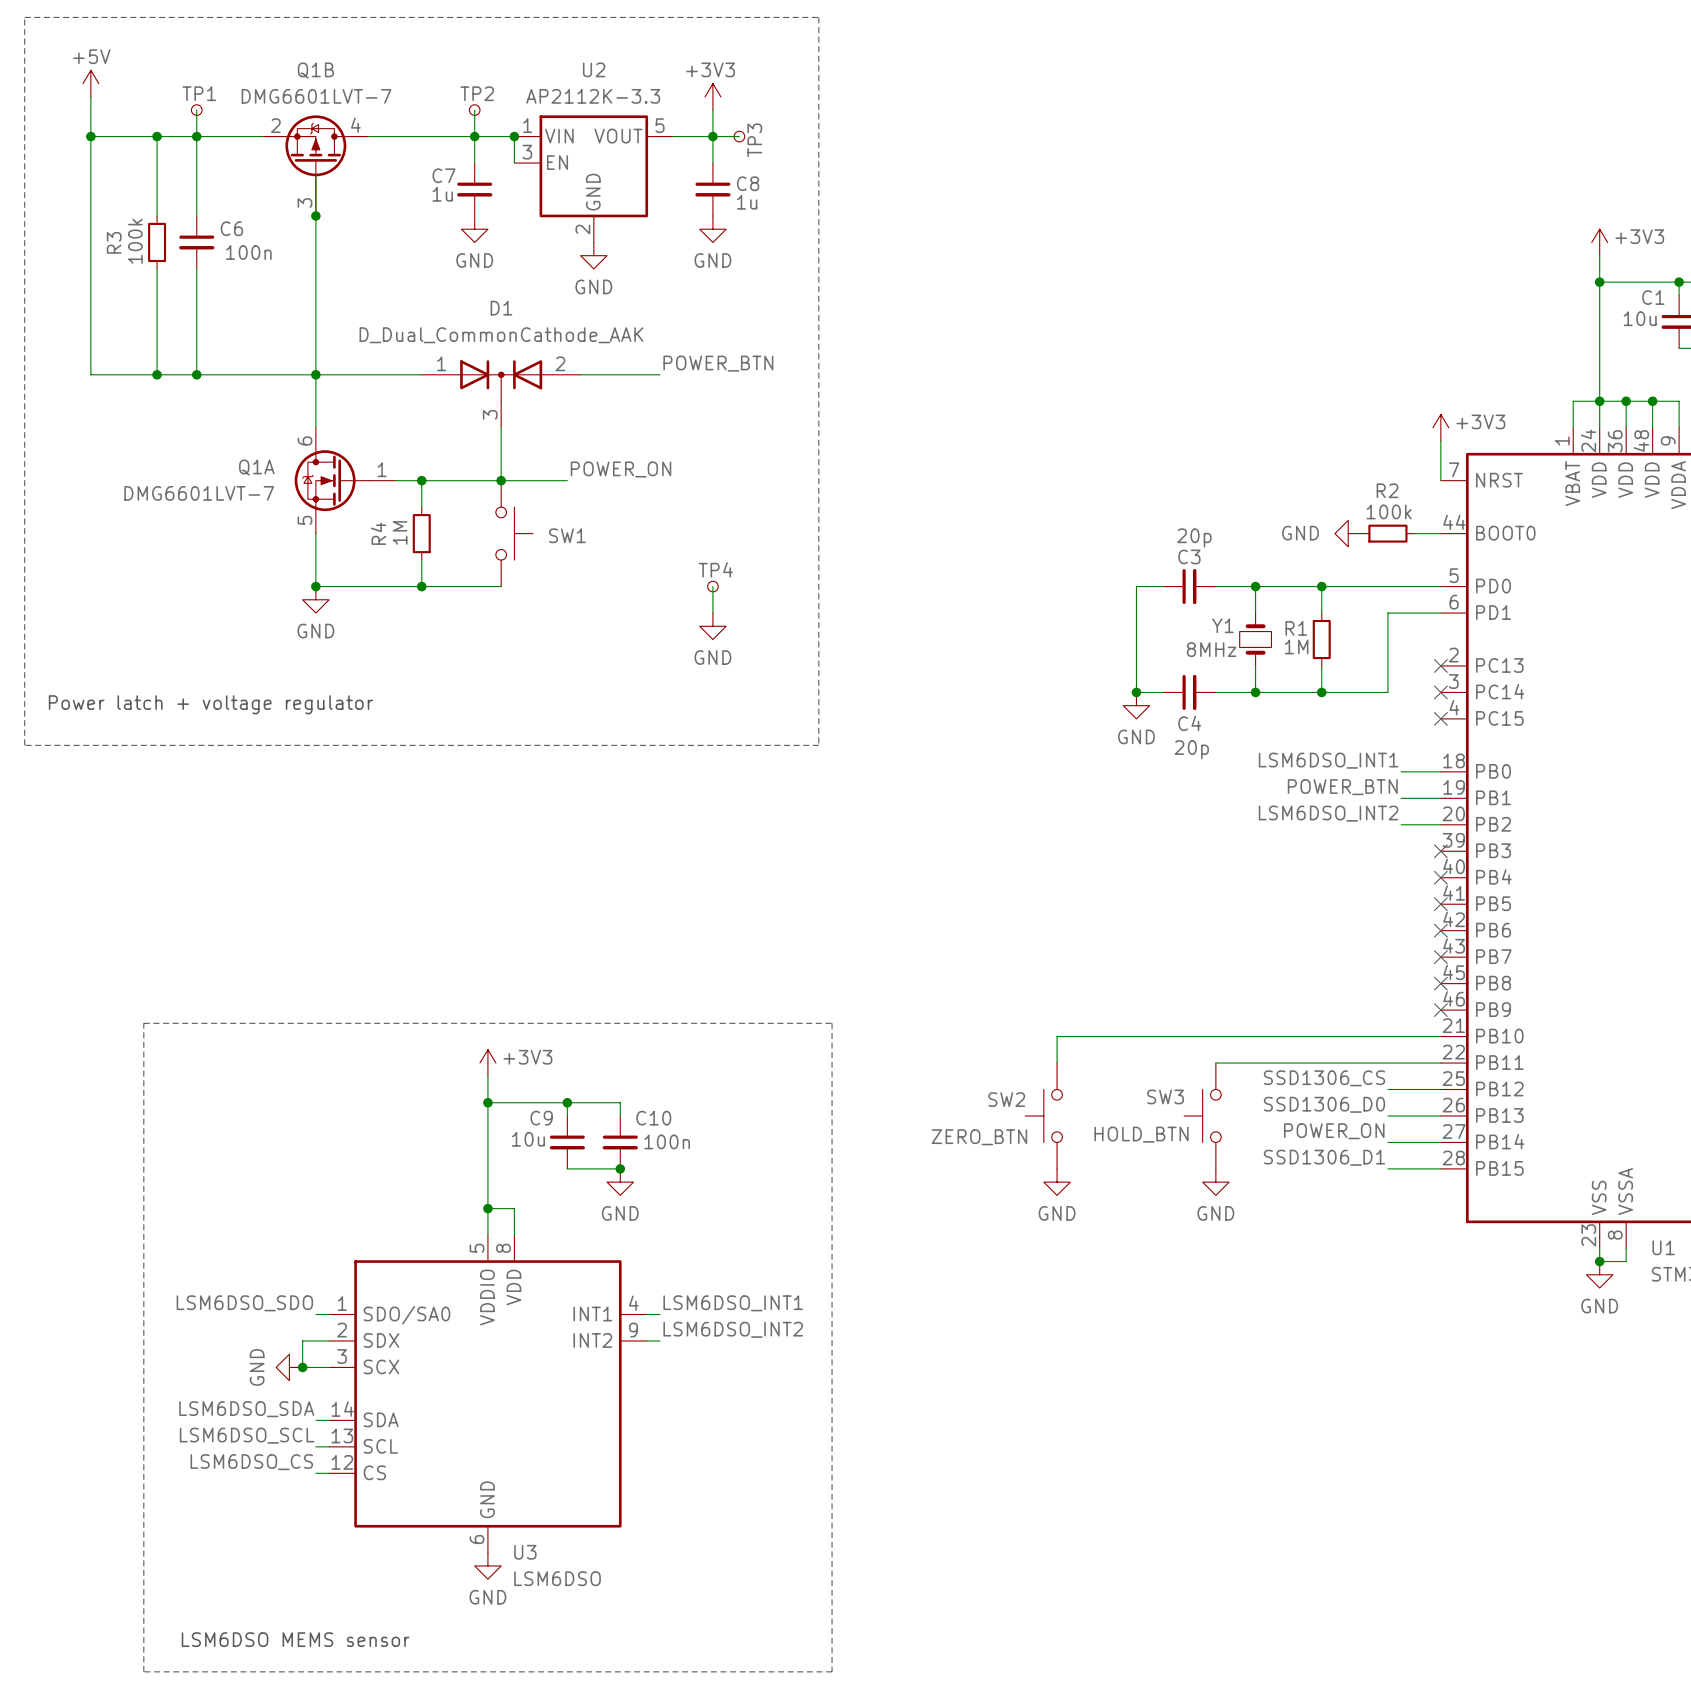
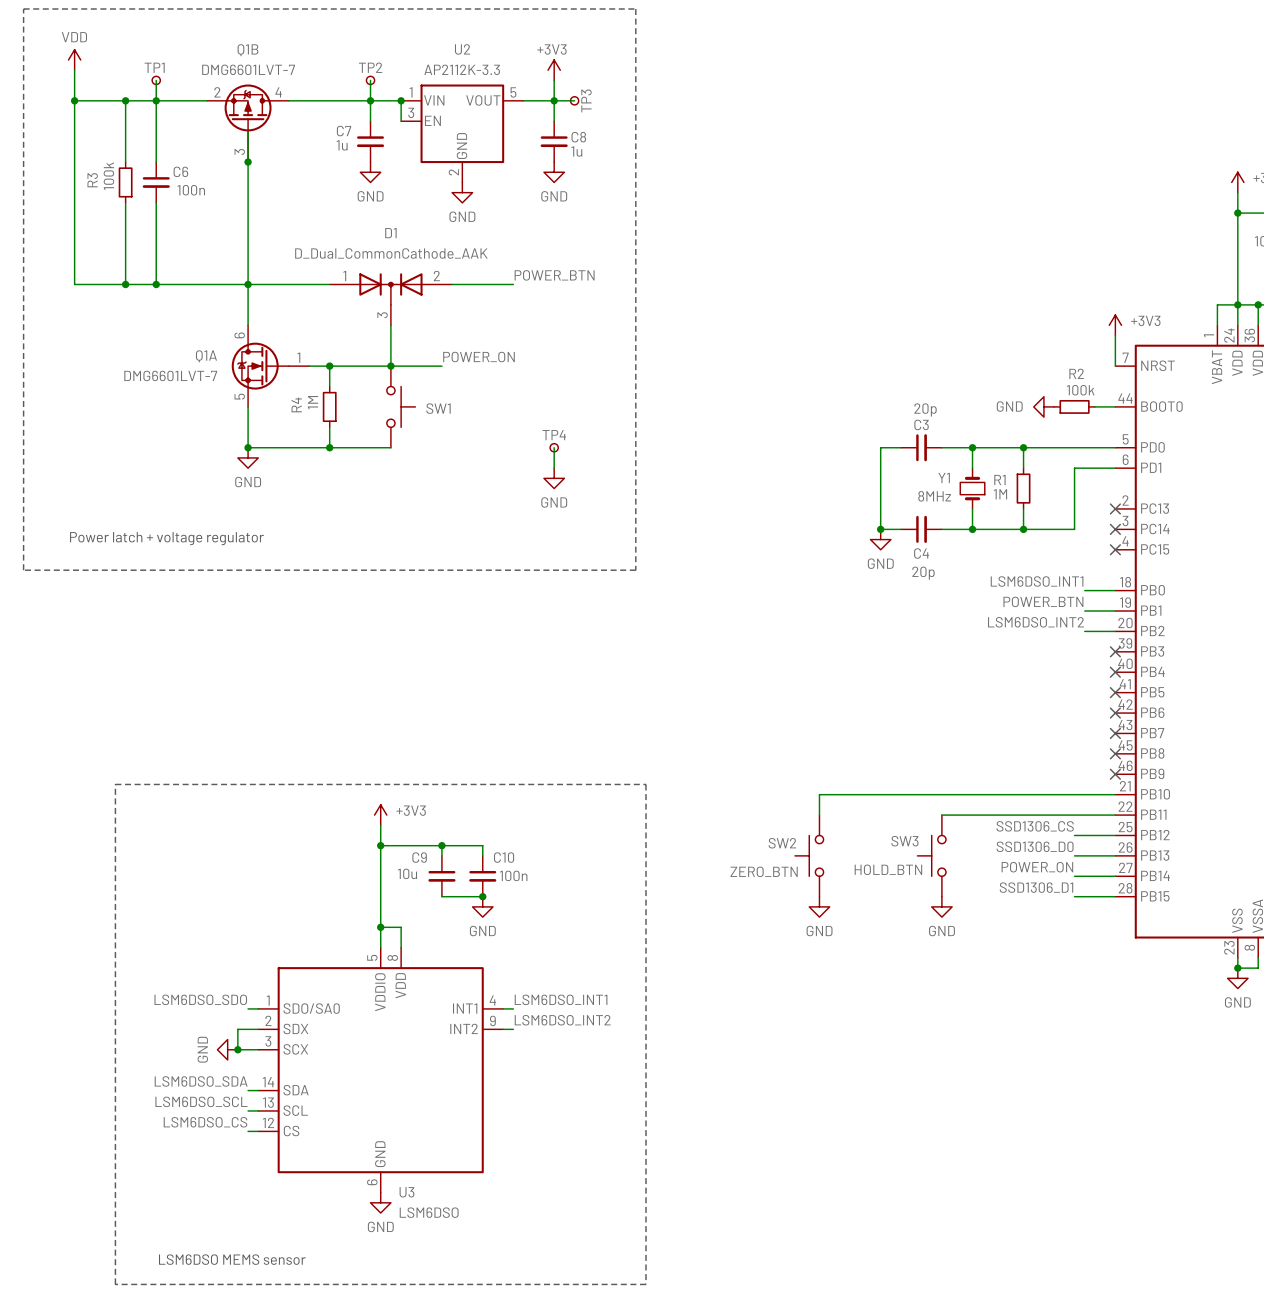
power symbol: +5V (90, 83) -> VDD (74, 60)

